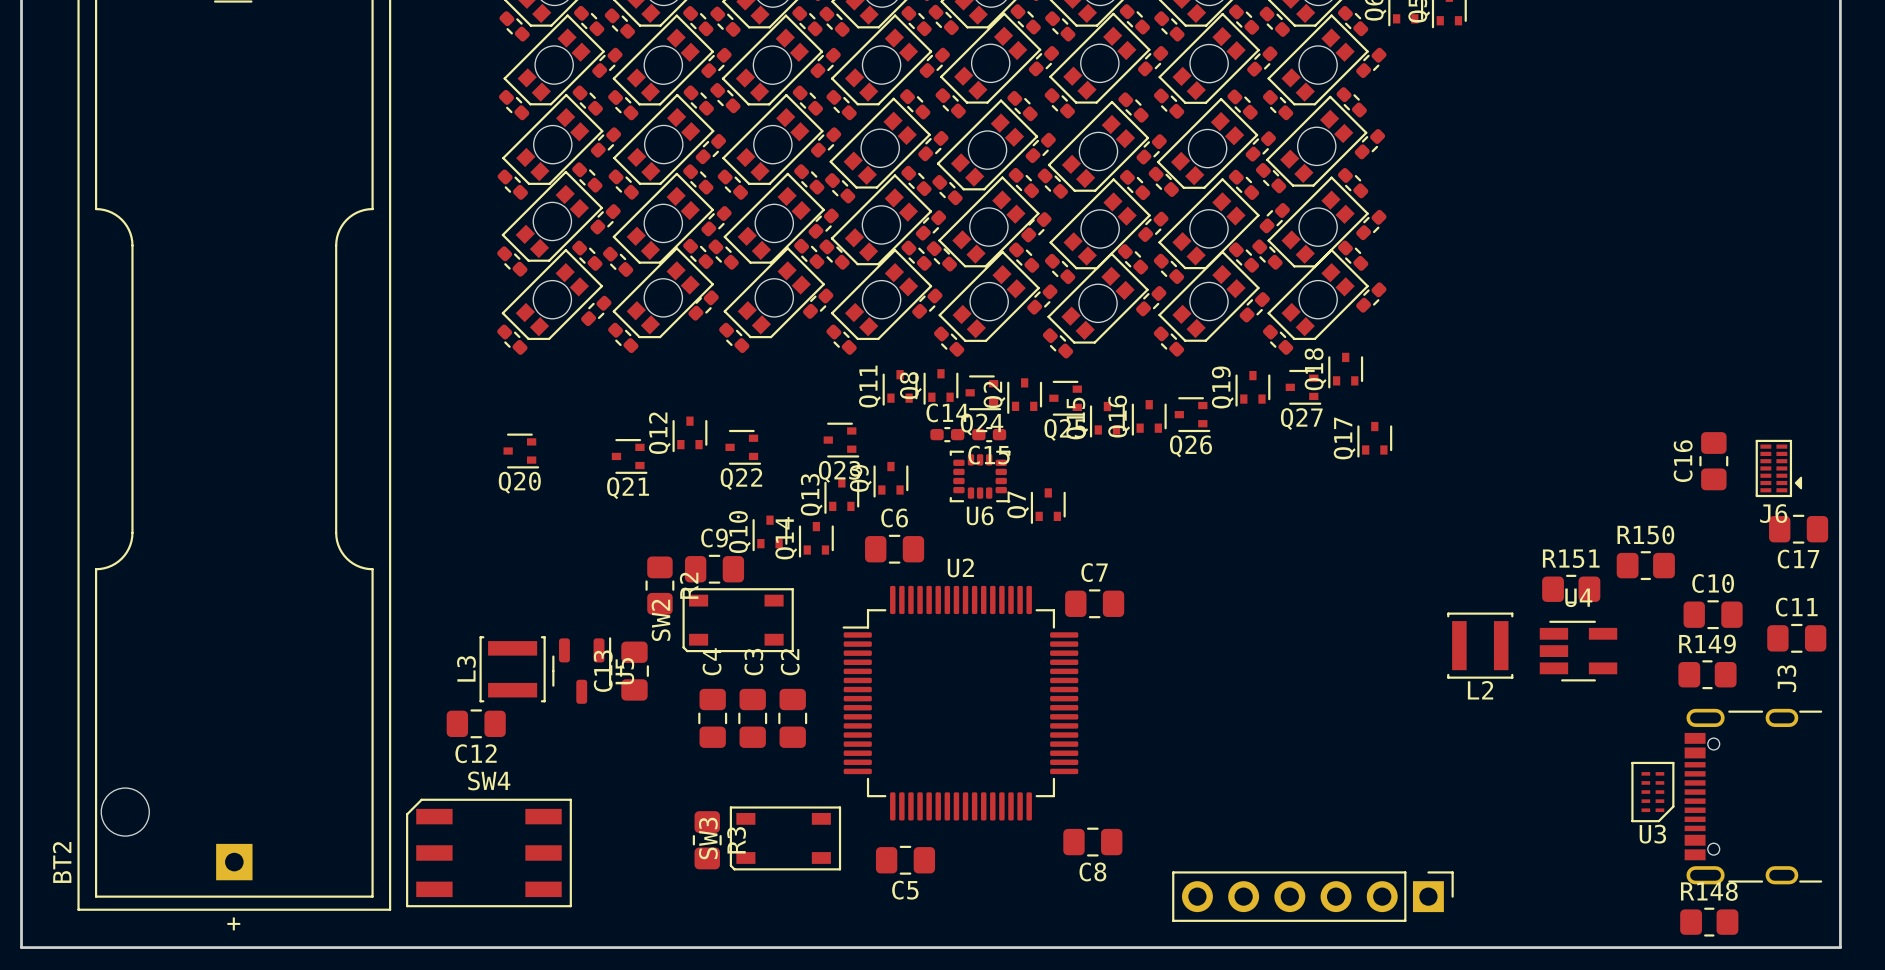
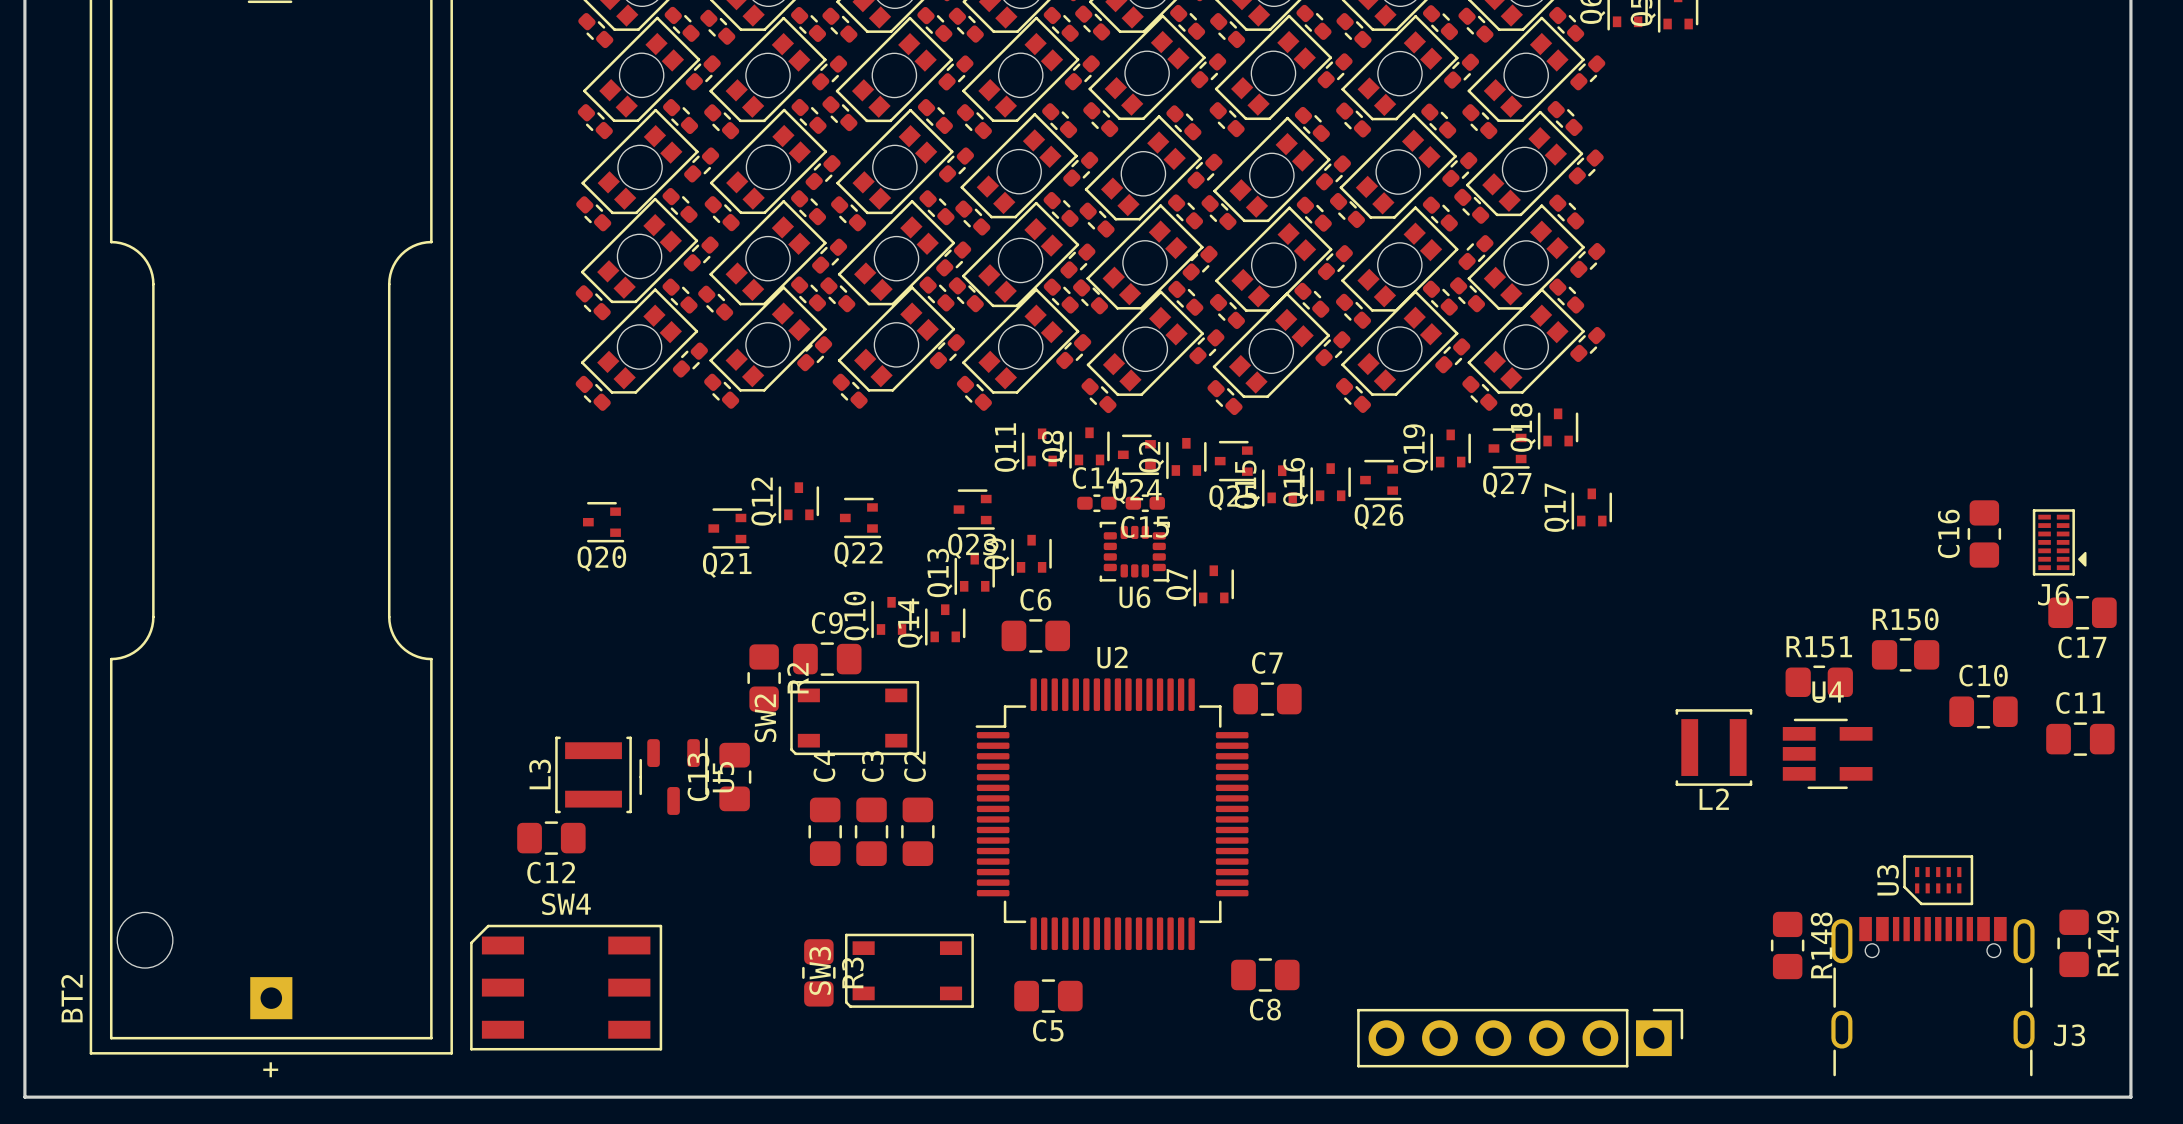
R149 rotation: 0° (1707, 674) -> 90° clockwise (2074, 943)
R149 position: (1707, 674) -> (2074, 943)
U3 rotation: 0° (1652, 792) -> 90° clockwise (1938, 880)
U3 position: (1652, 792) -> (1938, 880)
J3 rotation: 0° (1753, 796) -> 90° clockwise (1932, 996)
J3 position: (1753, 796) -> (1932, 996)
R148 rotation: 0° (1709, 922) -> 90° clockwise (1787, 945)
R148 position: (1709, 922) -> (1787, 945)

